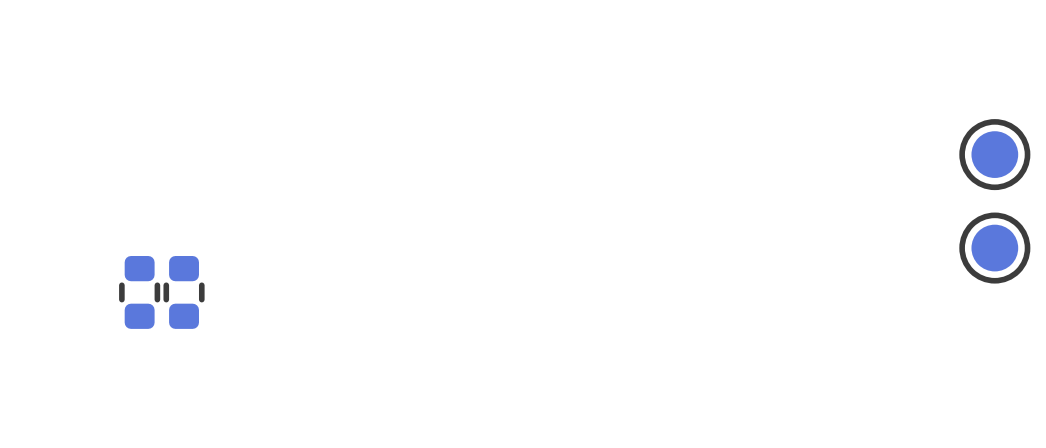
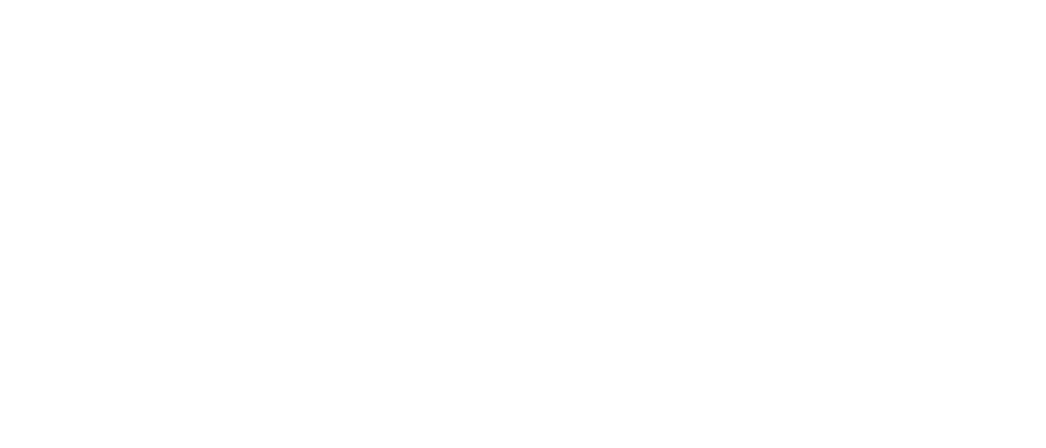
part: (994, 154) -> none
part: (994, 248) -> none
part: (139, 292) -> none
part: (184, 292) -> none

